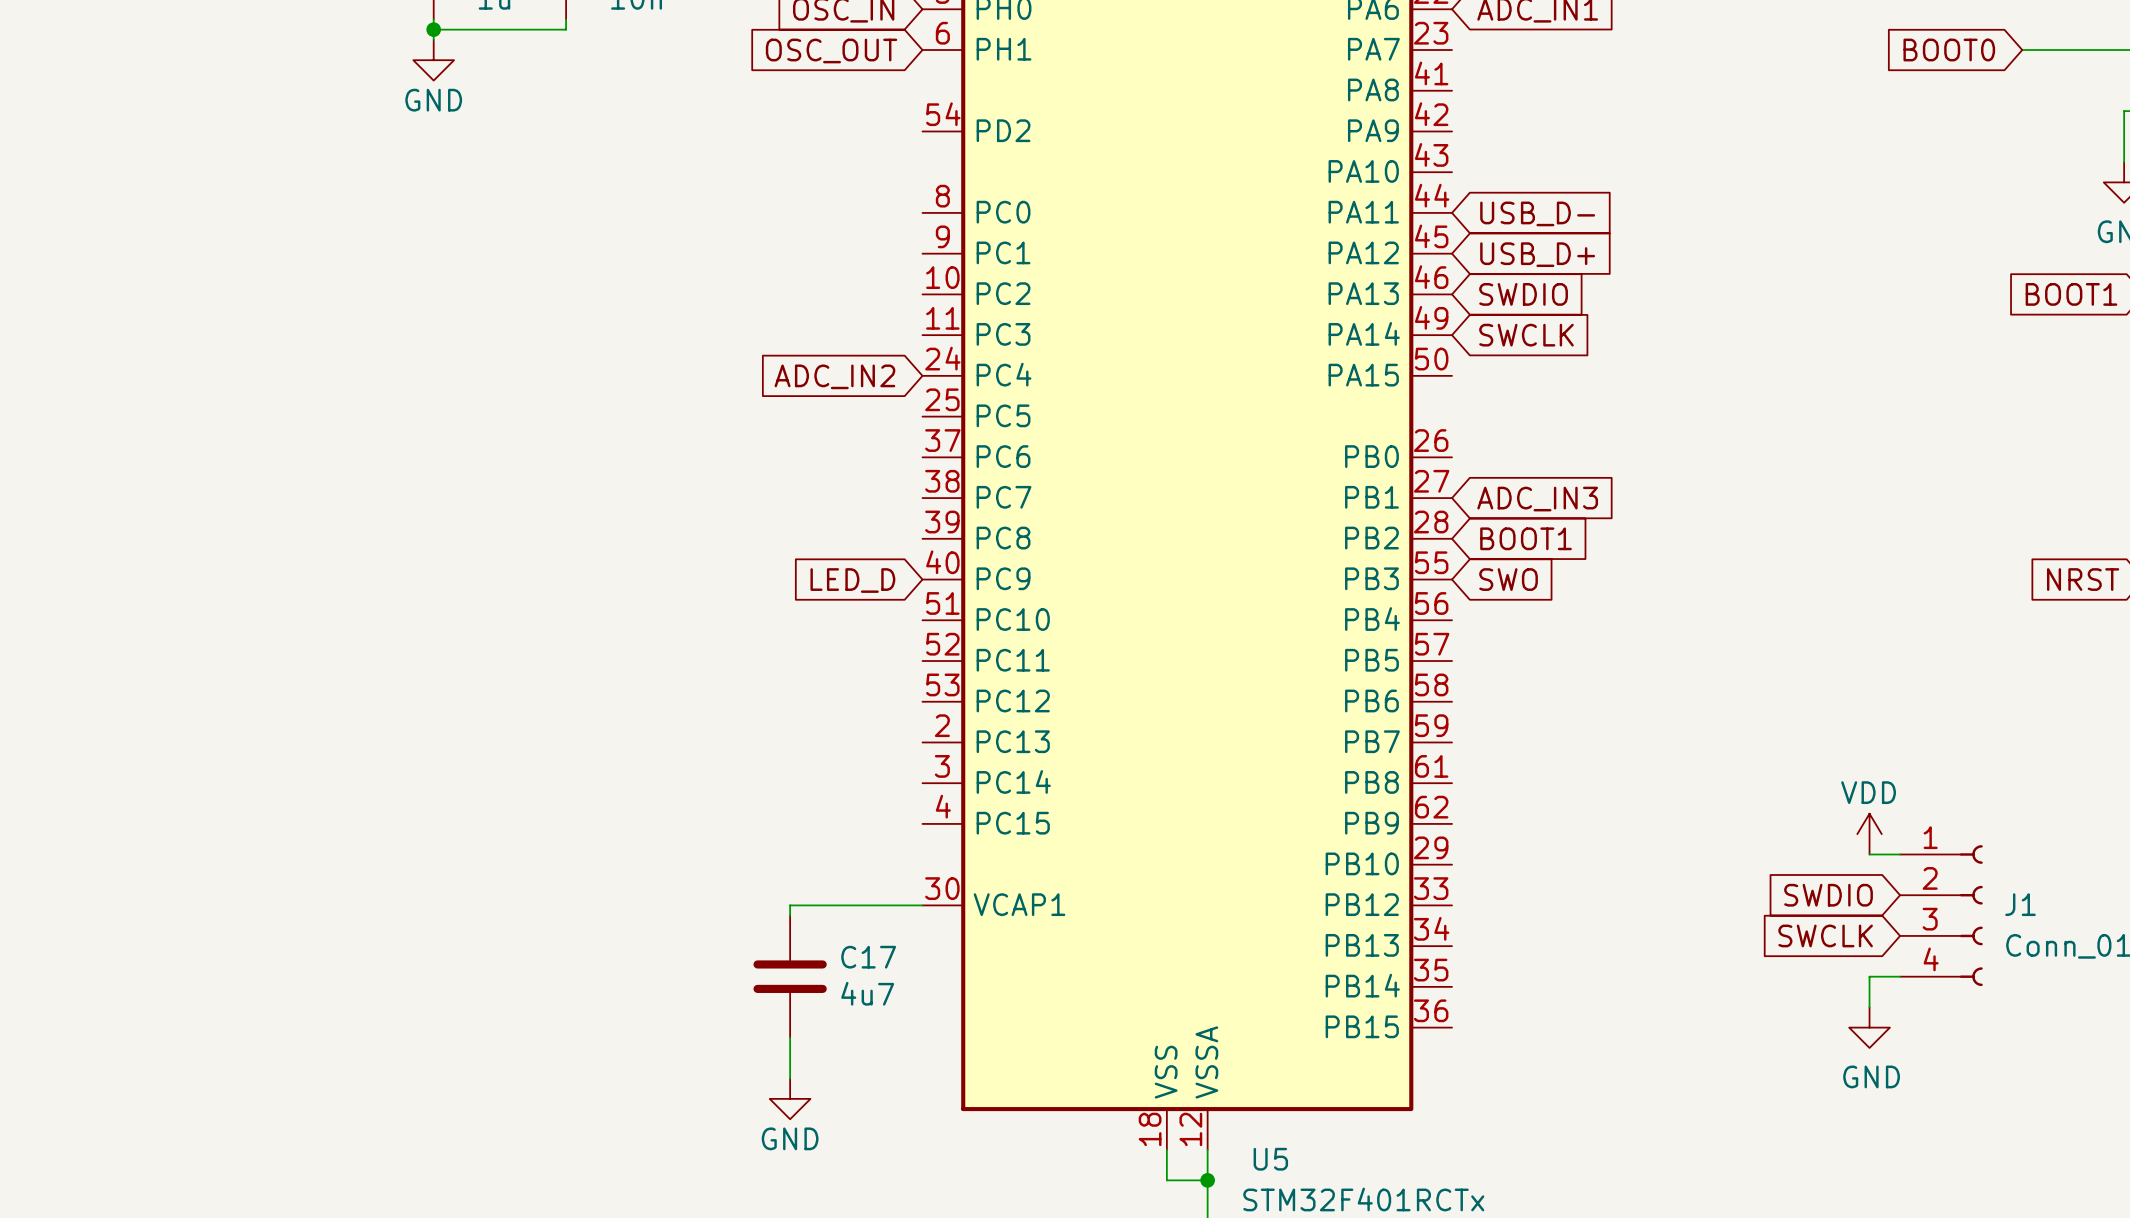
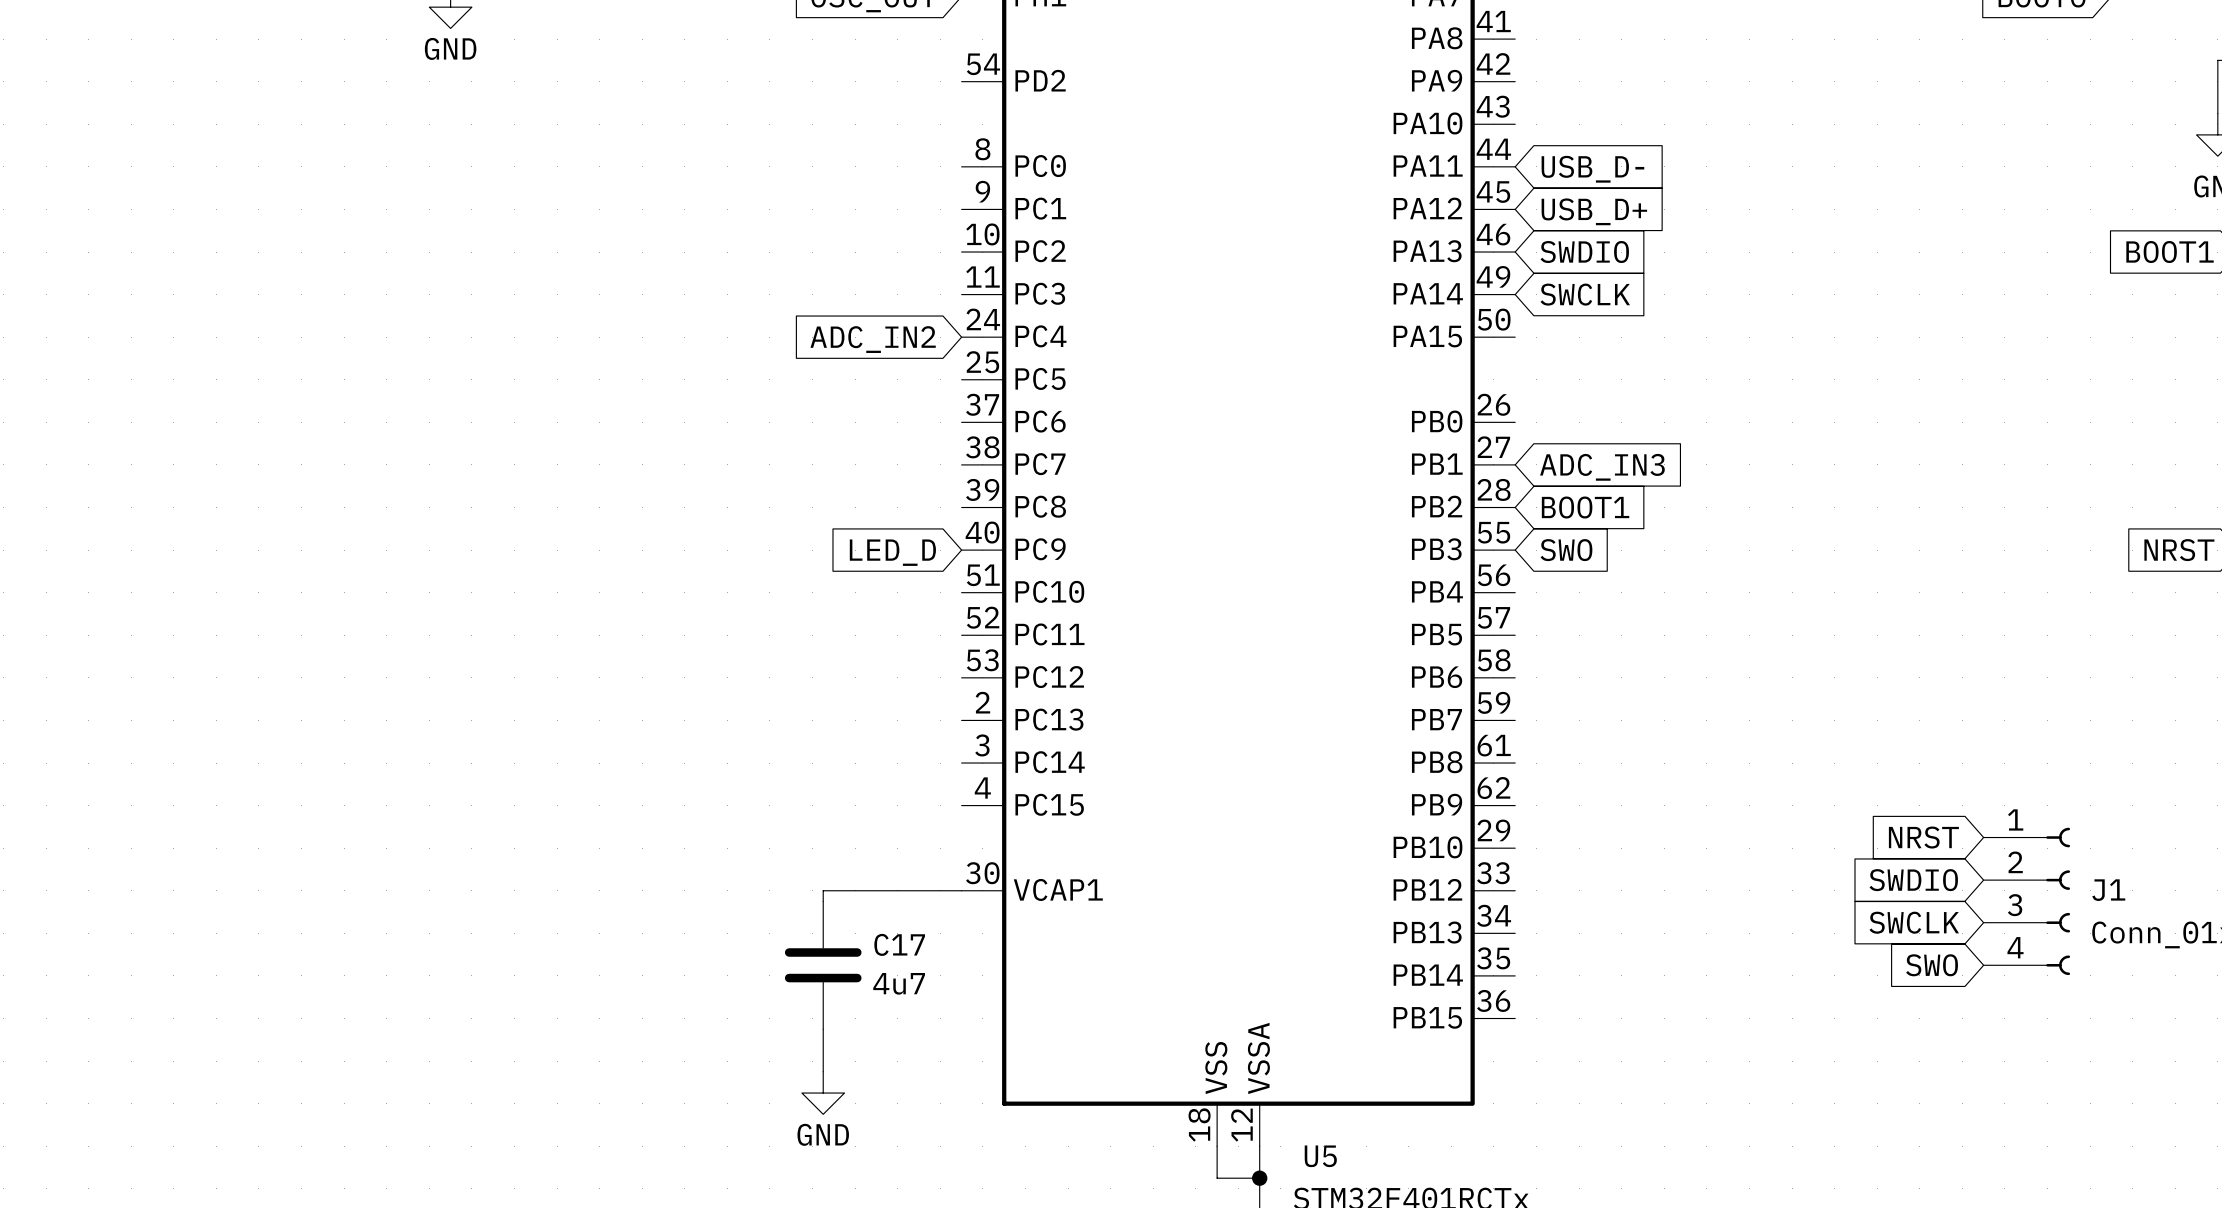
power symbol: VDD (1869, 834) -> none
global label: none -> NRST (1923, 837)
wire: (1869, 854) (1900, 854) -> none
global label: none -> SWO (1932, 965)
wire: (1900, 976) (1869, 976) (1869, 1007) -> none
power symbol: GND (1869, 1027) -> none

